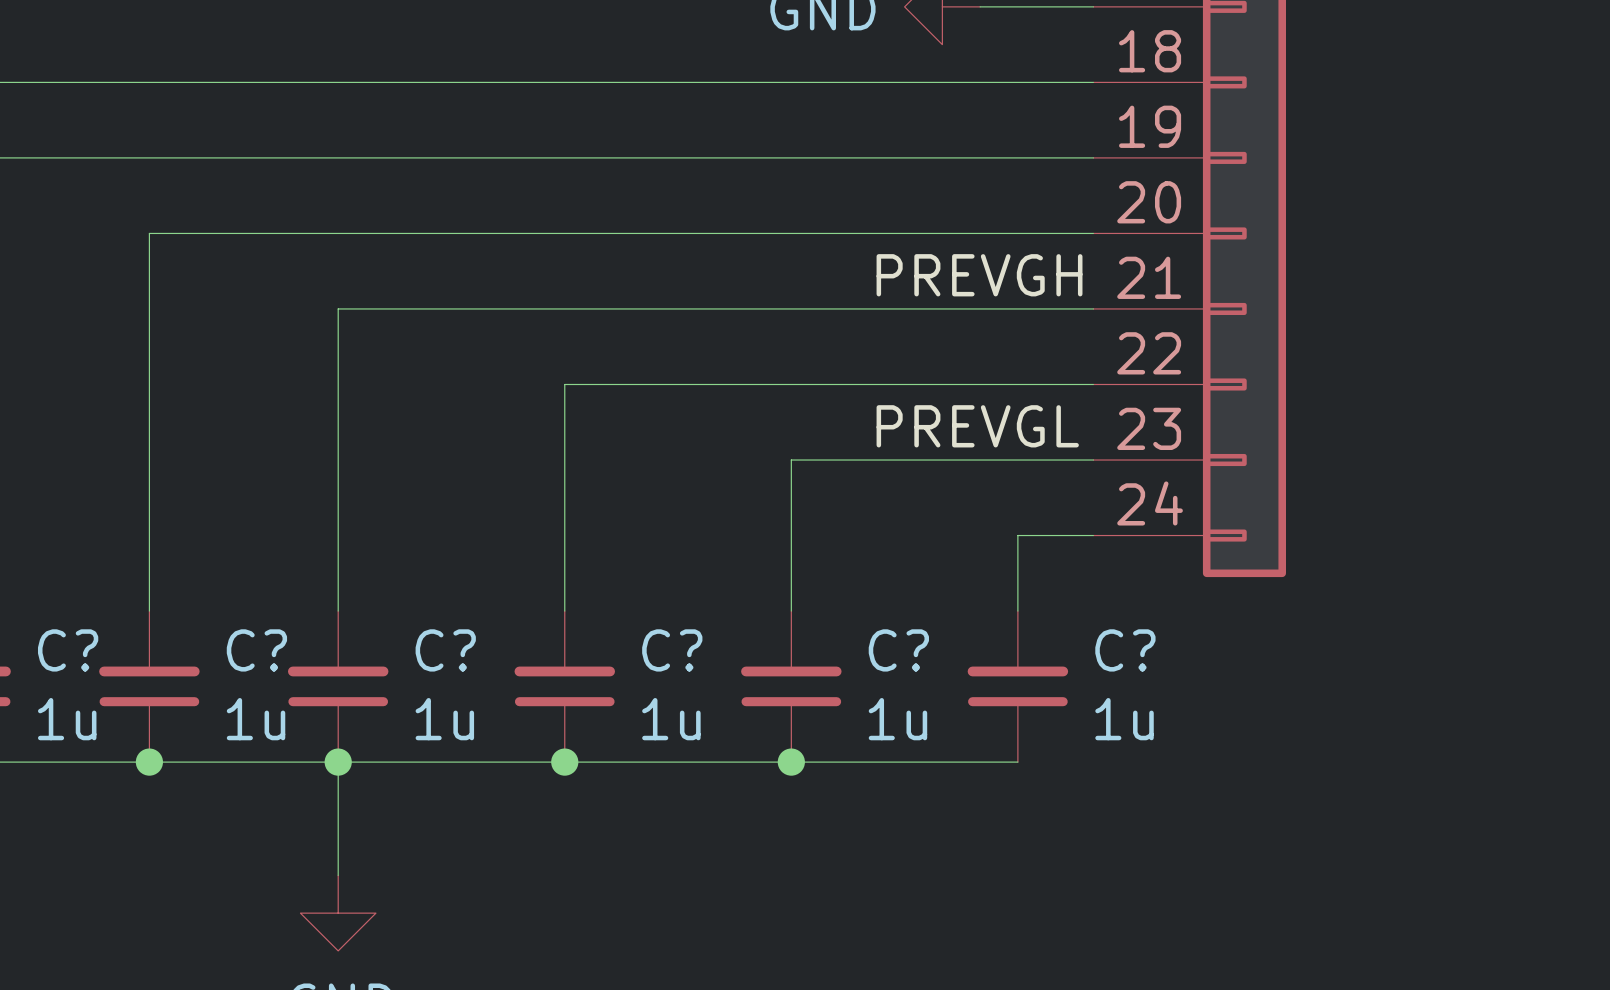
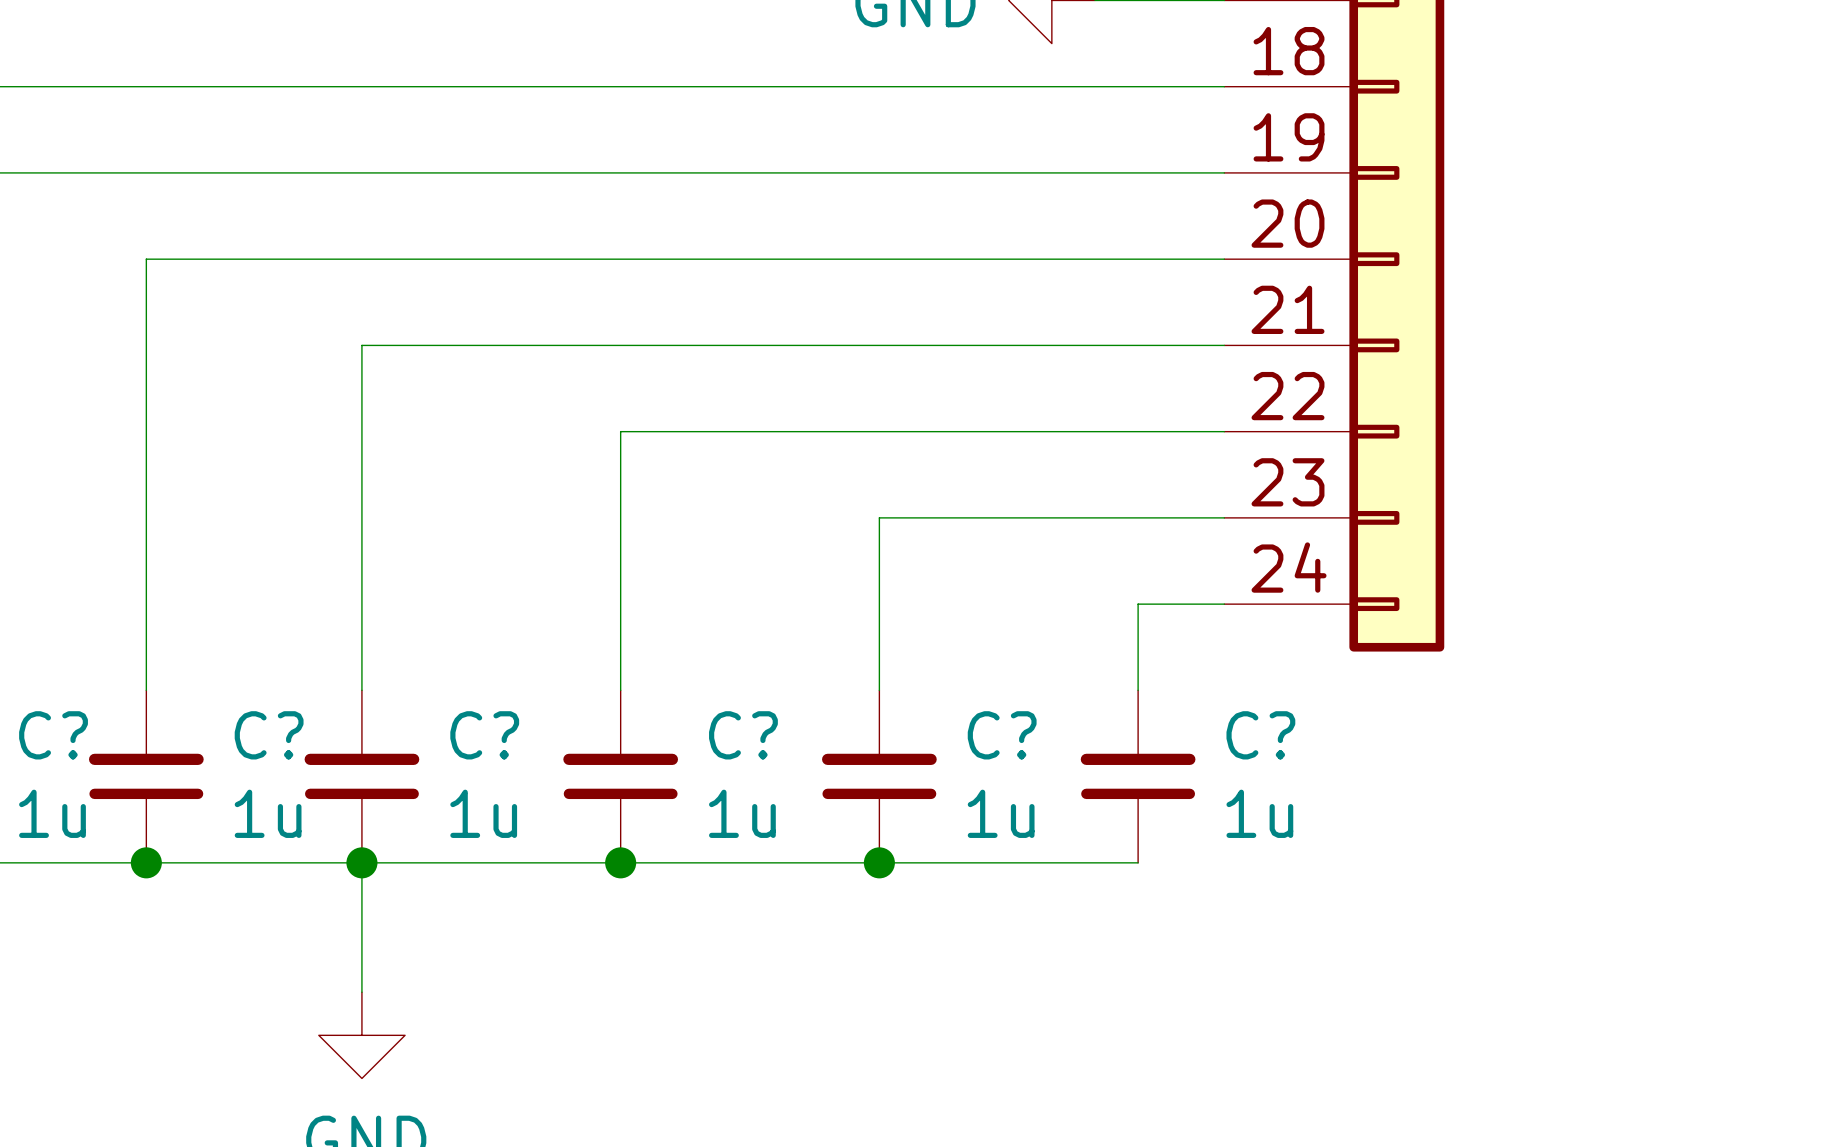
label: PREVGH (979, 275) -> none
label: PREVGL (977, 426) -> none

